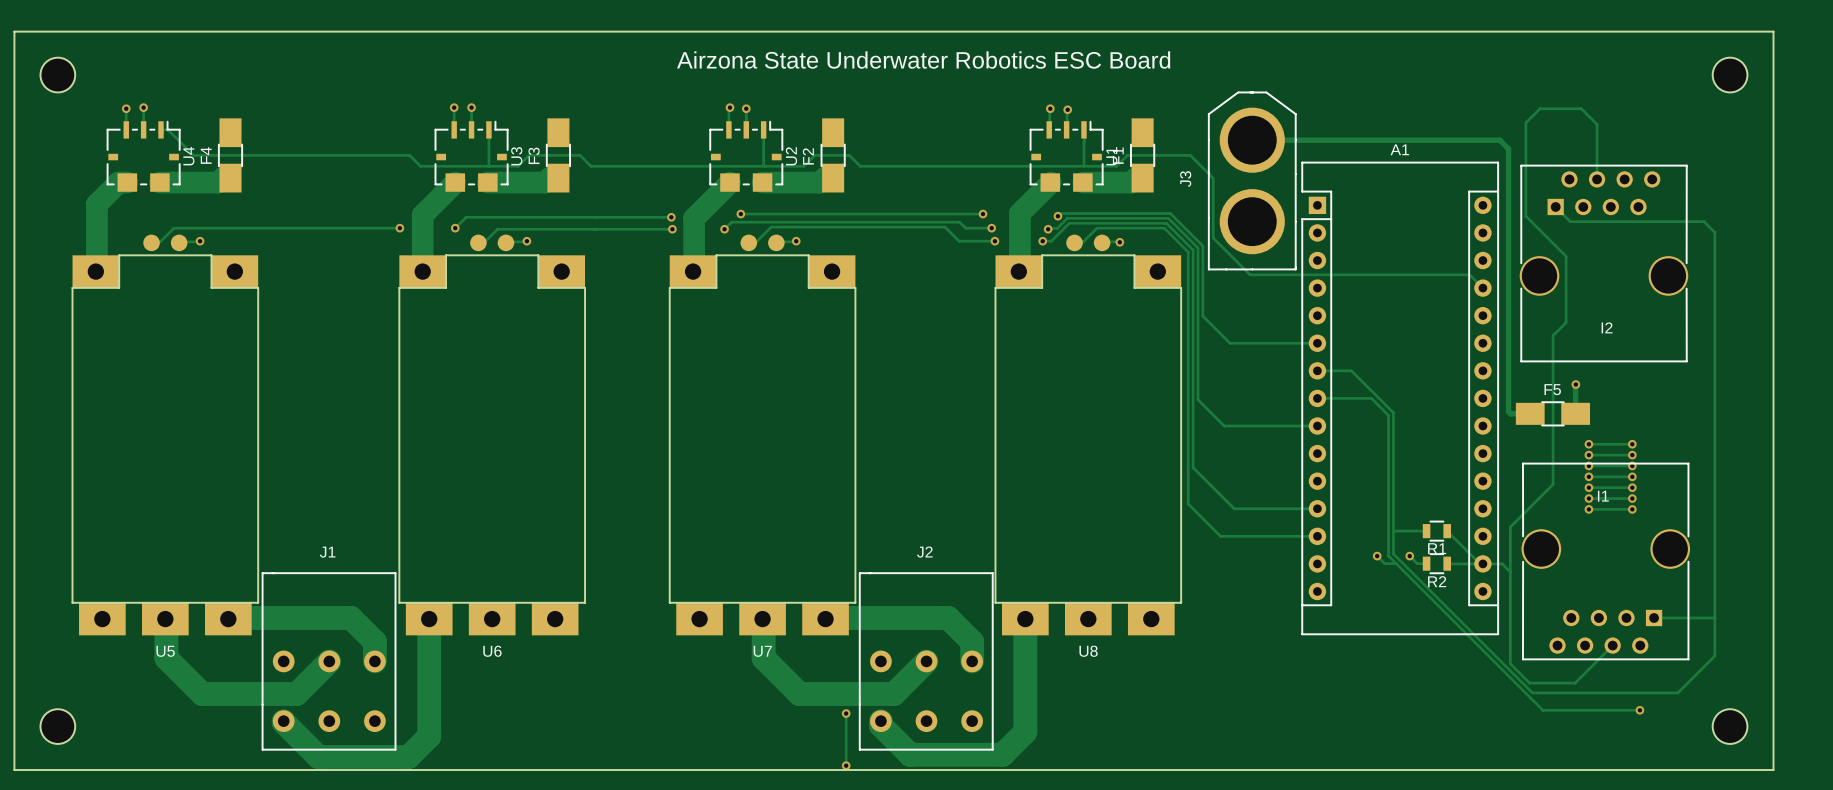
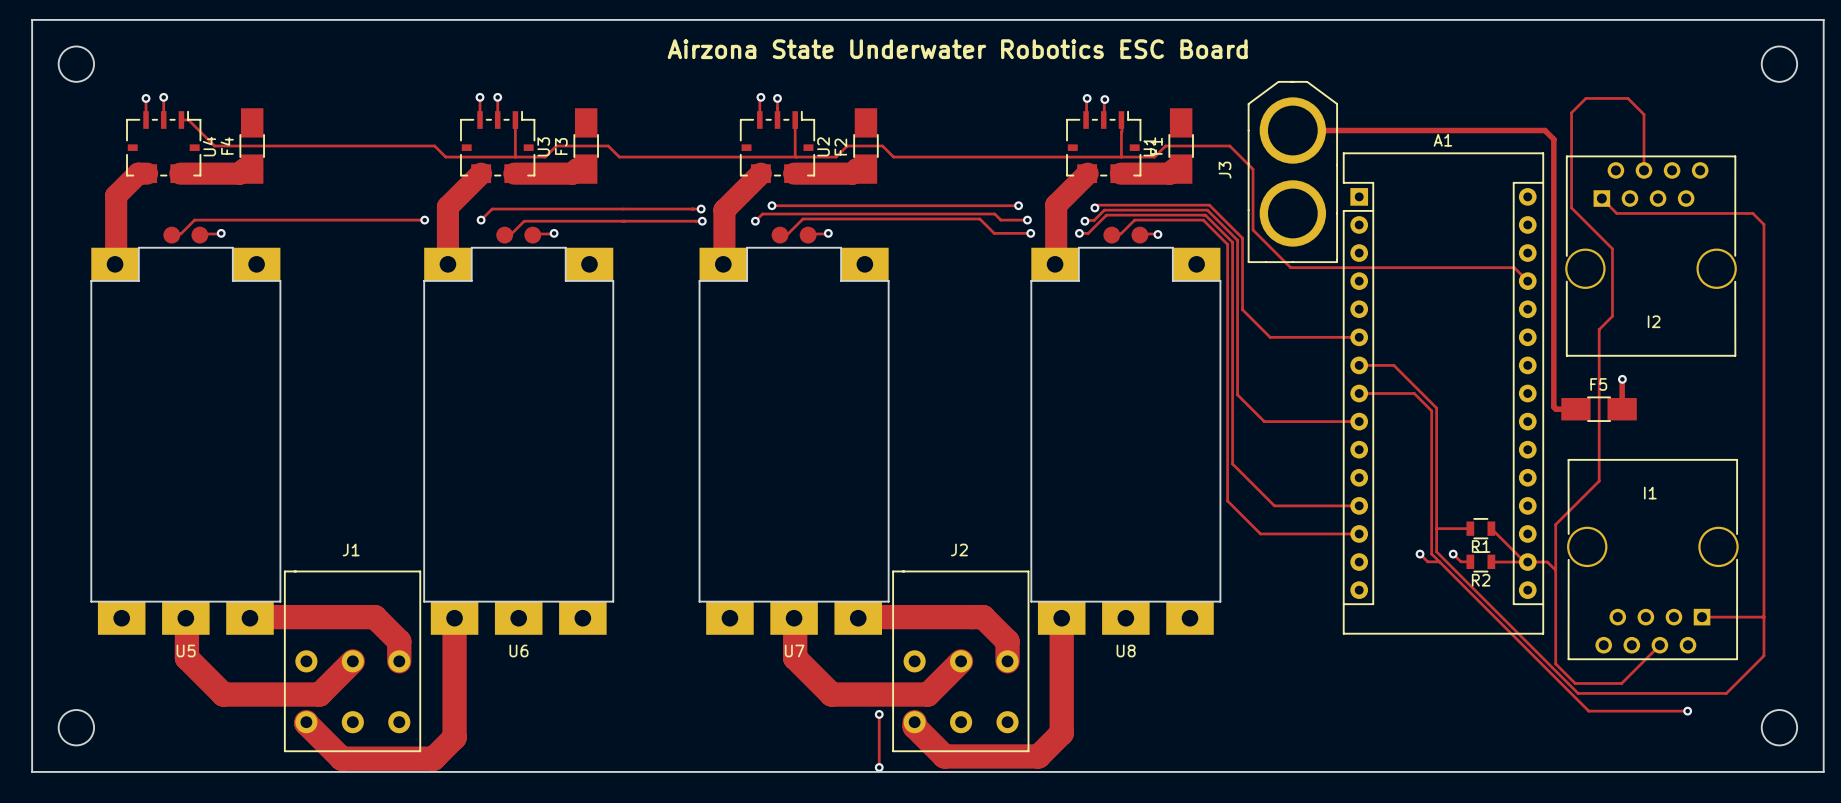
track: (1588, 444) (1632, 444) -> none
via: (1588, 444) -> none
via: (1632, 444) -> none
track: (1588, 455) (1632, 455) -> none
via: (1588, 455) -> none
via: (1632, 455) -> none
track: (1588, 465) (1632, 465) -> none
via: (1588, 465) -> none
via: (1632, 465) -> none
track: (1588, 476) (1632, 476) -> none
via: (1588, 476) -> none
via: (1632, 476) -> none
track: (1588, 487) (1632, 487) -> none
via: (1588, 487) -> none
via: (1632, 487) -> none
track: (1588, 498) (1632, 498) -> none
via: (1588, 498) -> none
via: (1632, 498) -> none
track: (1588, 509) (1632, 509) -> none
via: (1588, 509) -> none
via: (1632, 509) -> none

